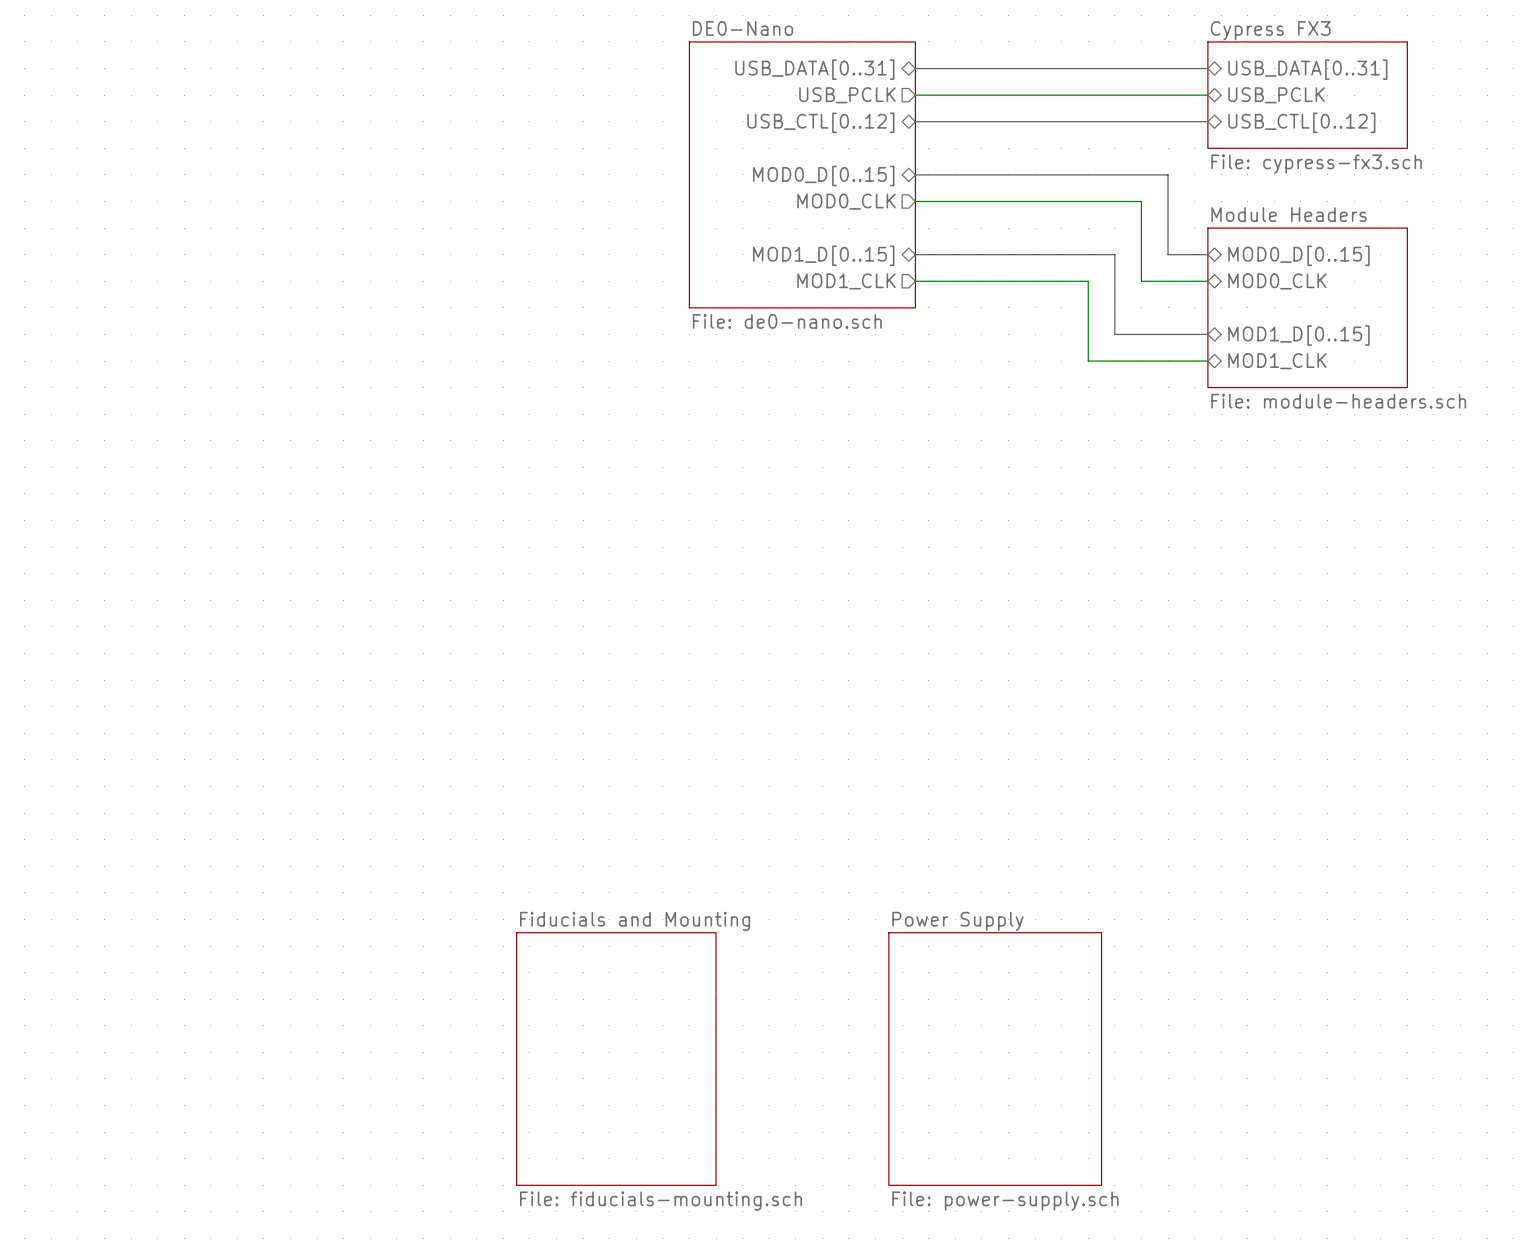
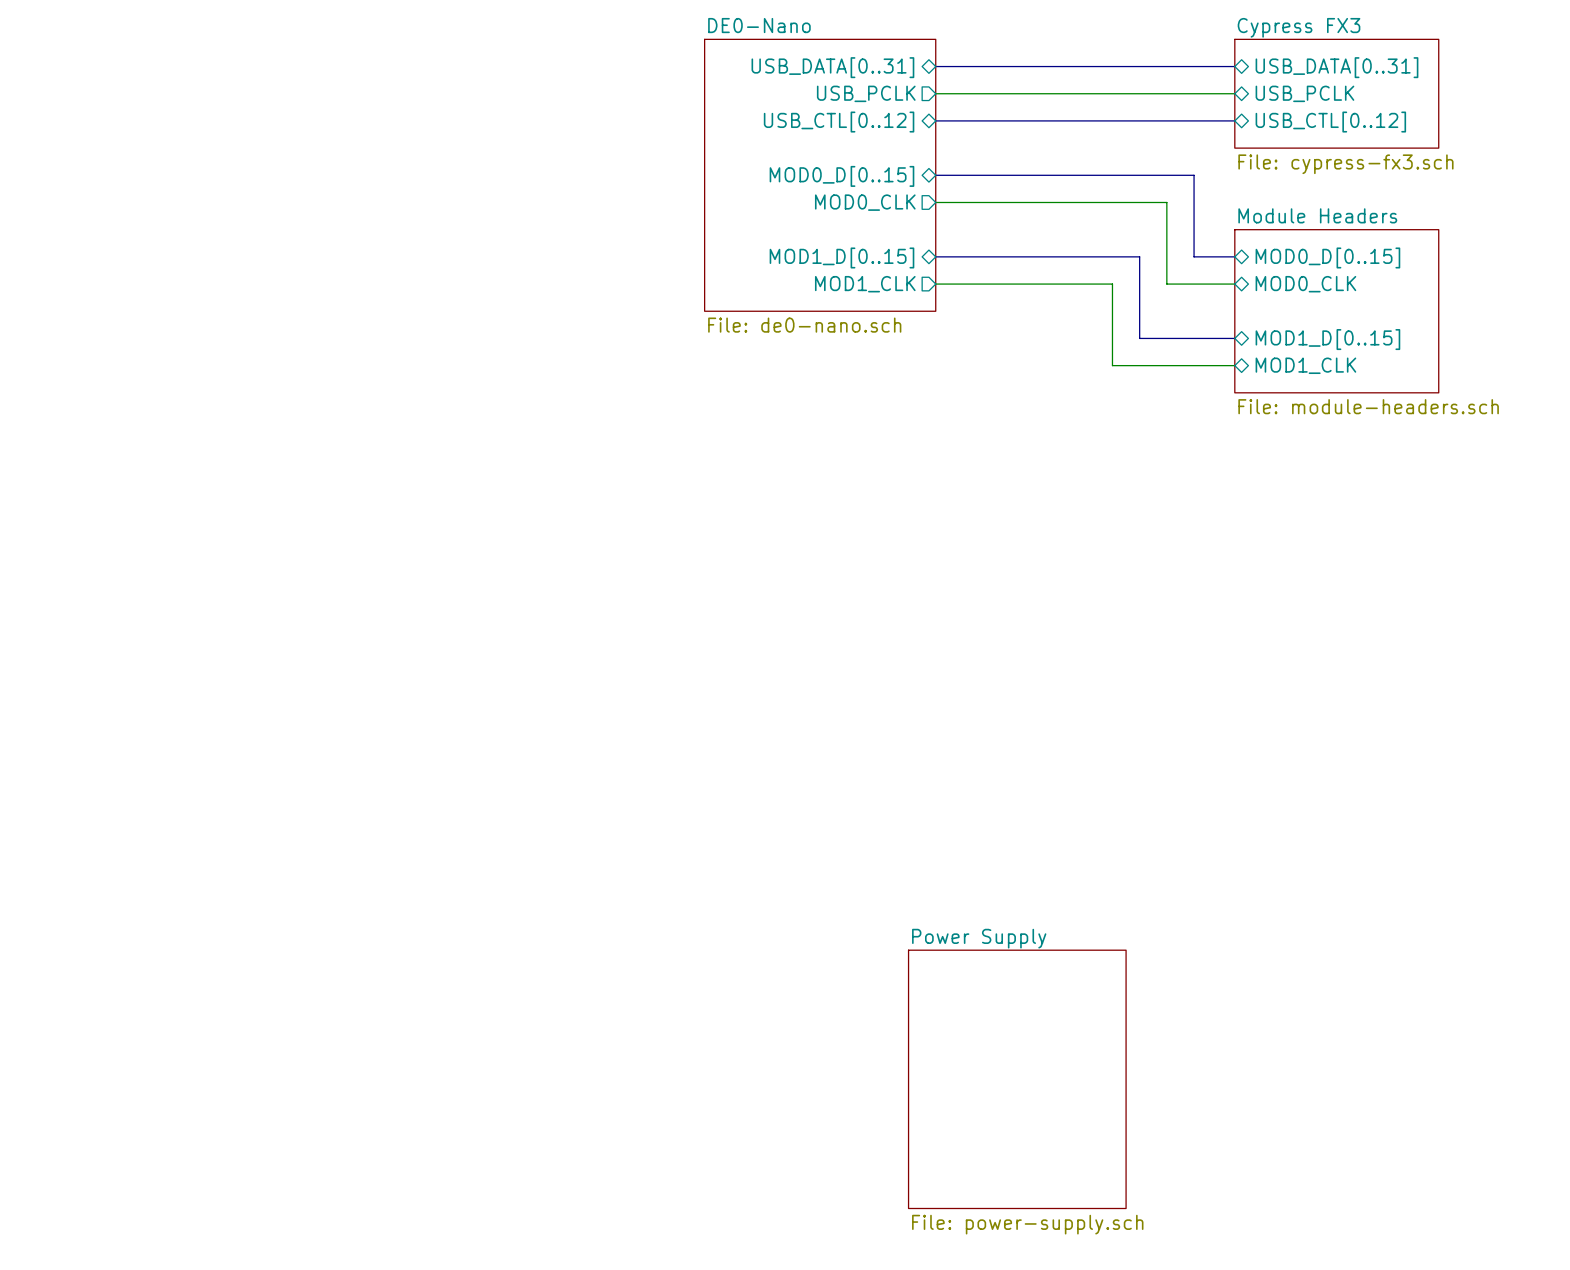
sheet Fiducials and Mounting: File: fiducials-mounting.sch (616, 1059) -> none

